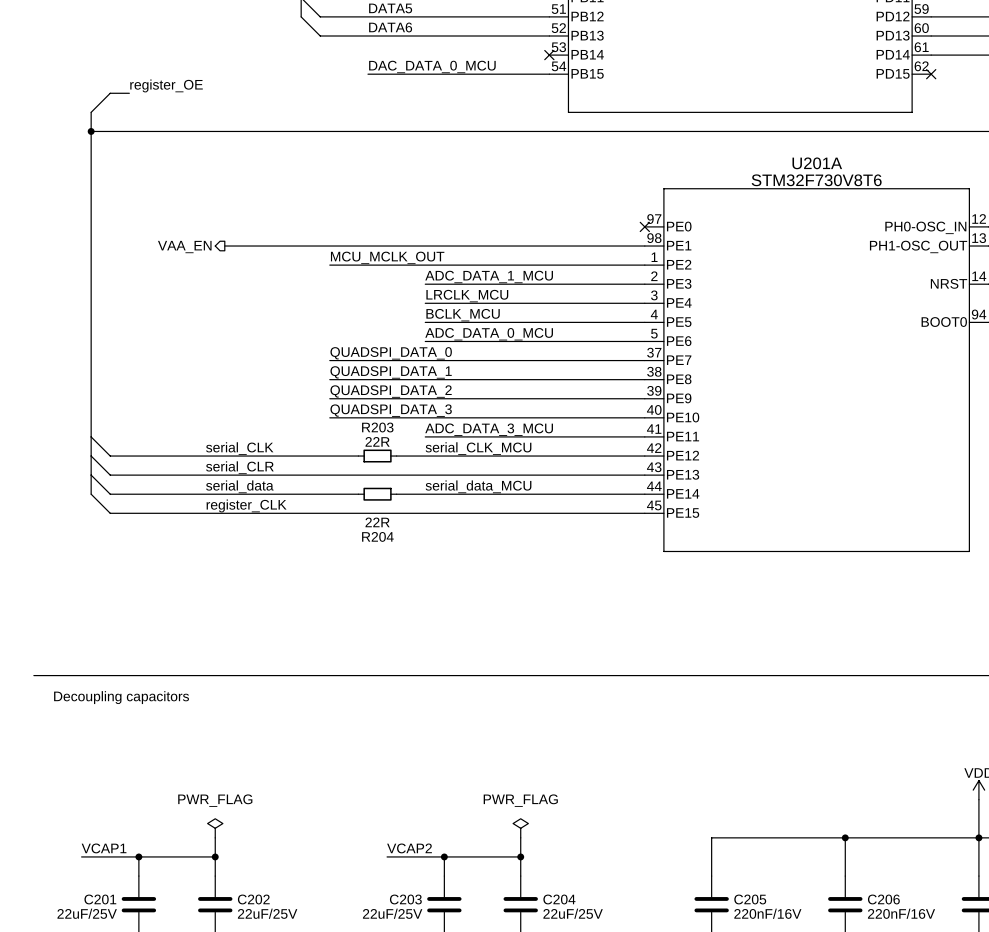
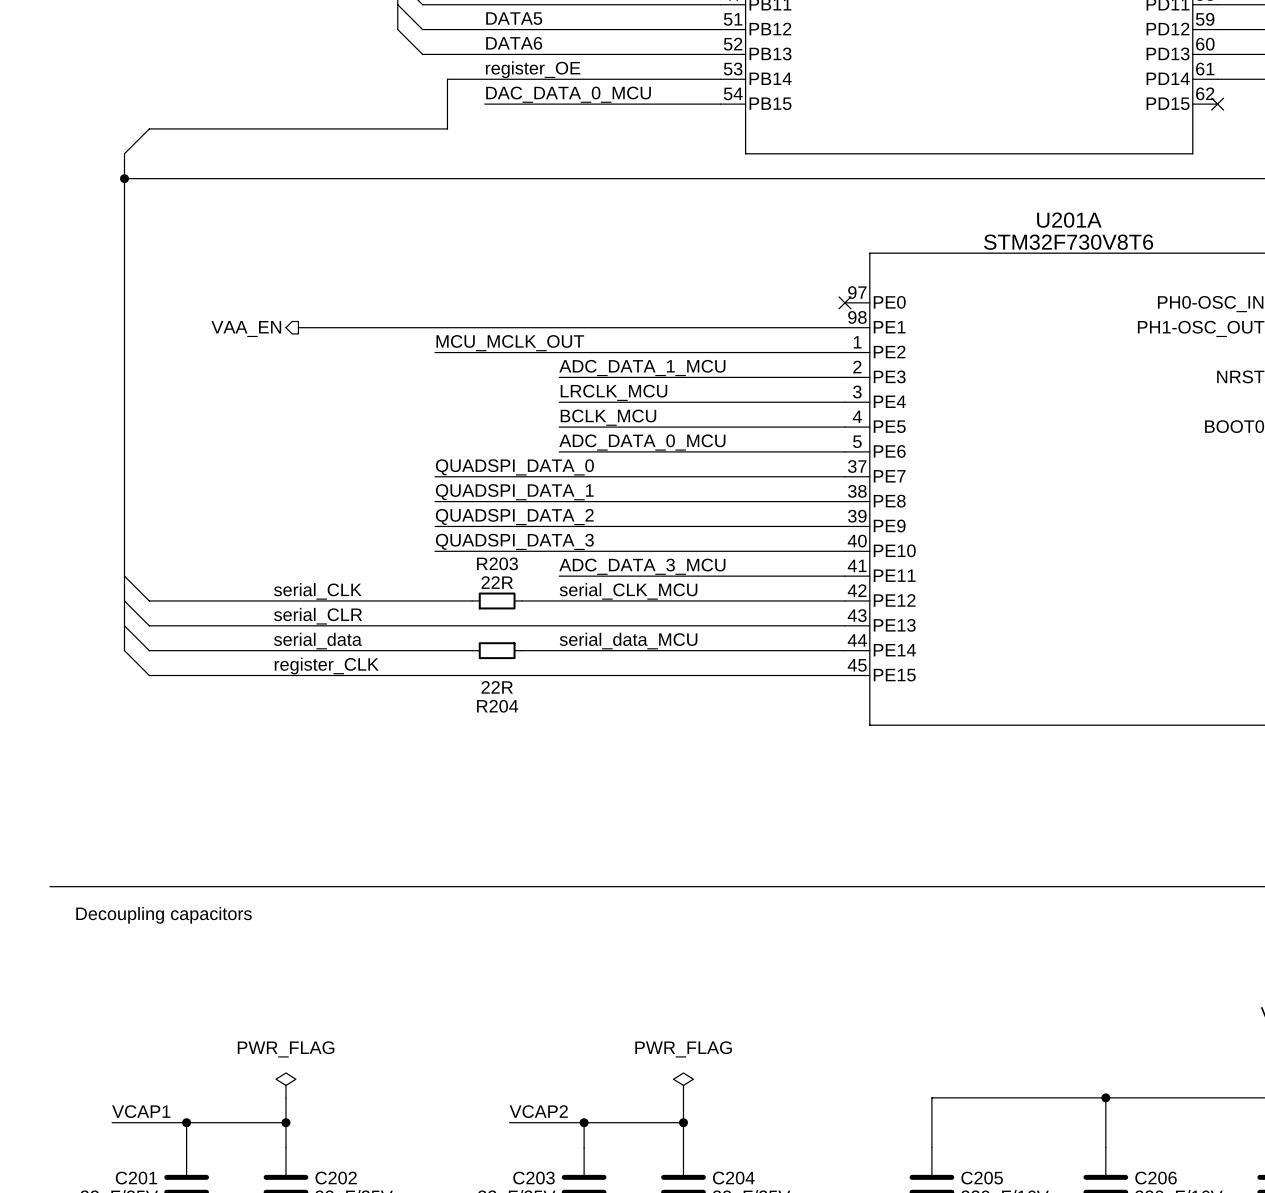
label: none -> register_OE (533, 69)
wire: none -> (720, 79) (447, 79) (447, 128) (174, 128)
no-connect mark: (549, 55) -> none
label: register_OE (166, 85) -> none

